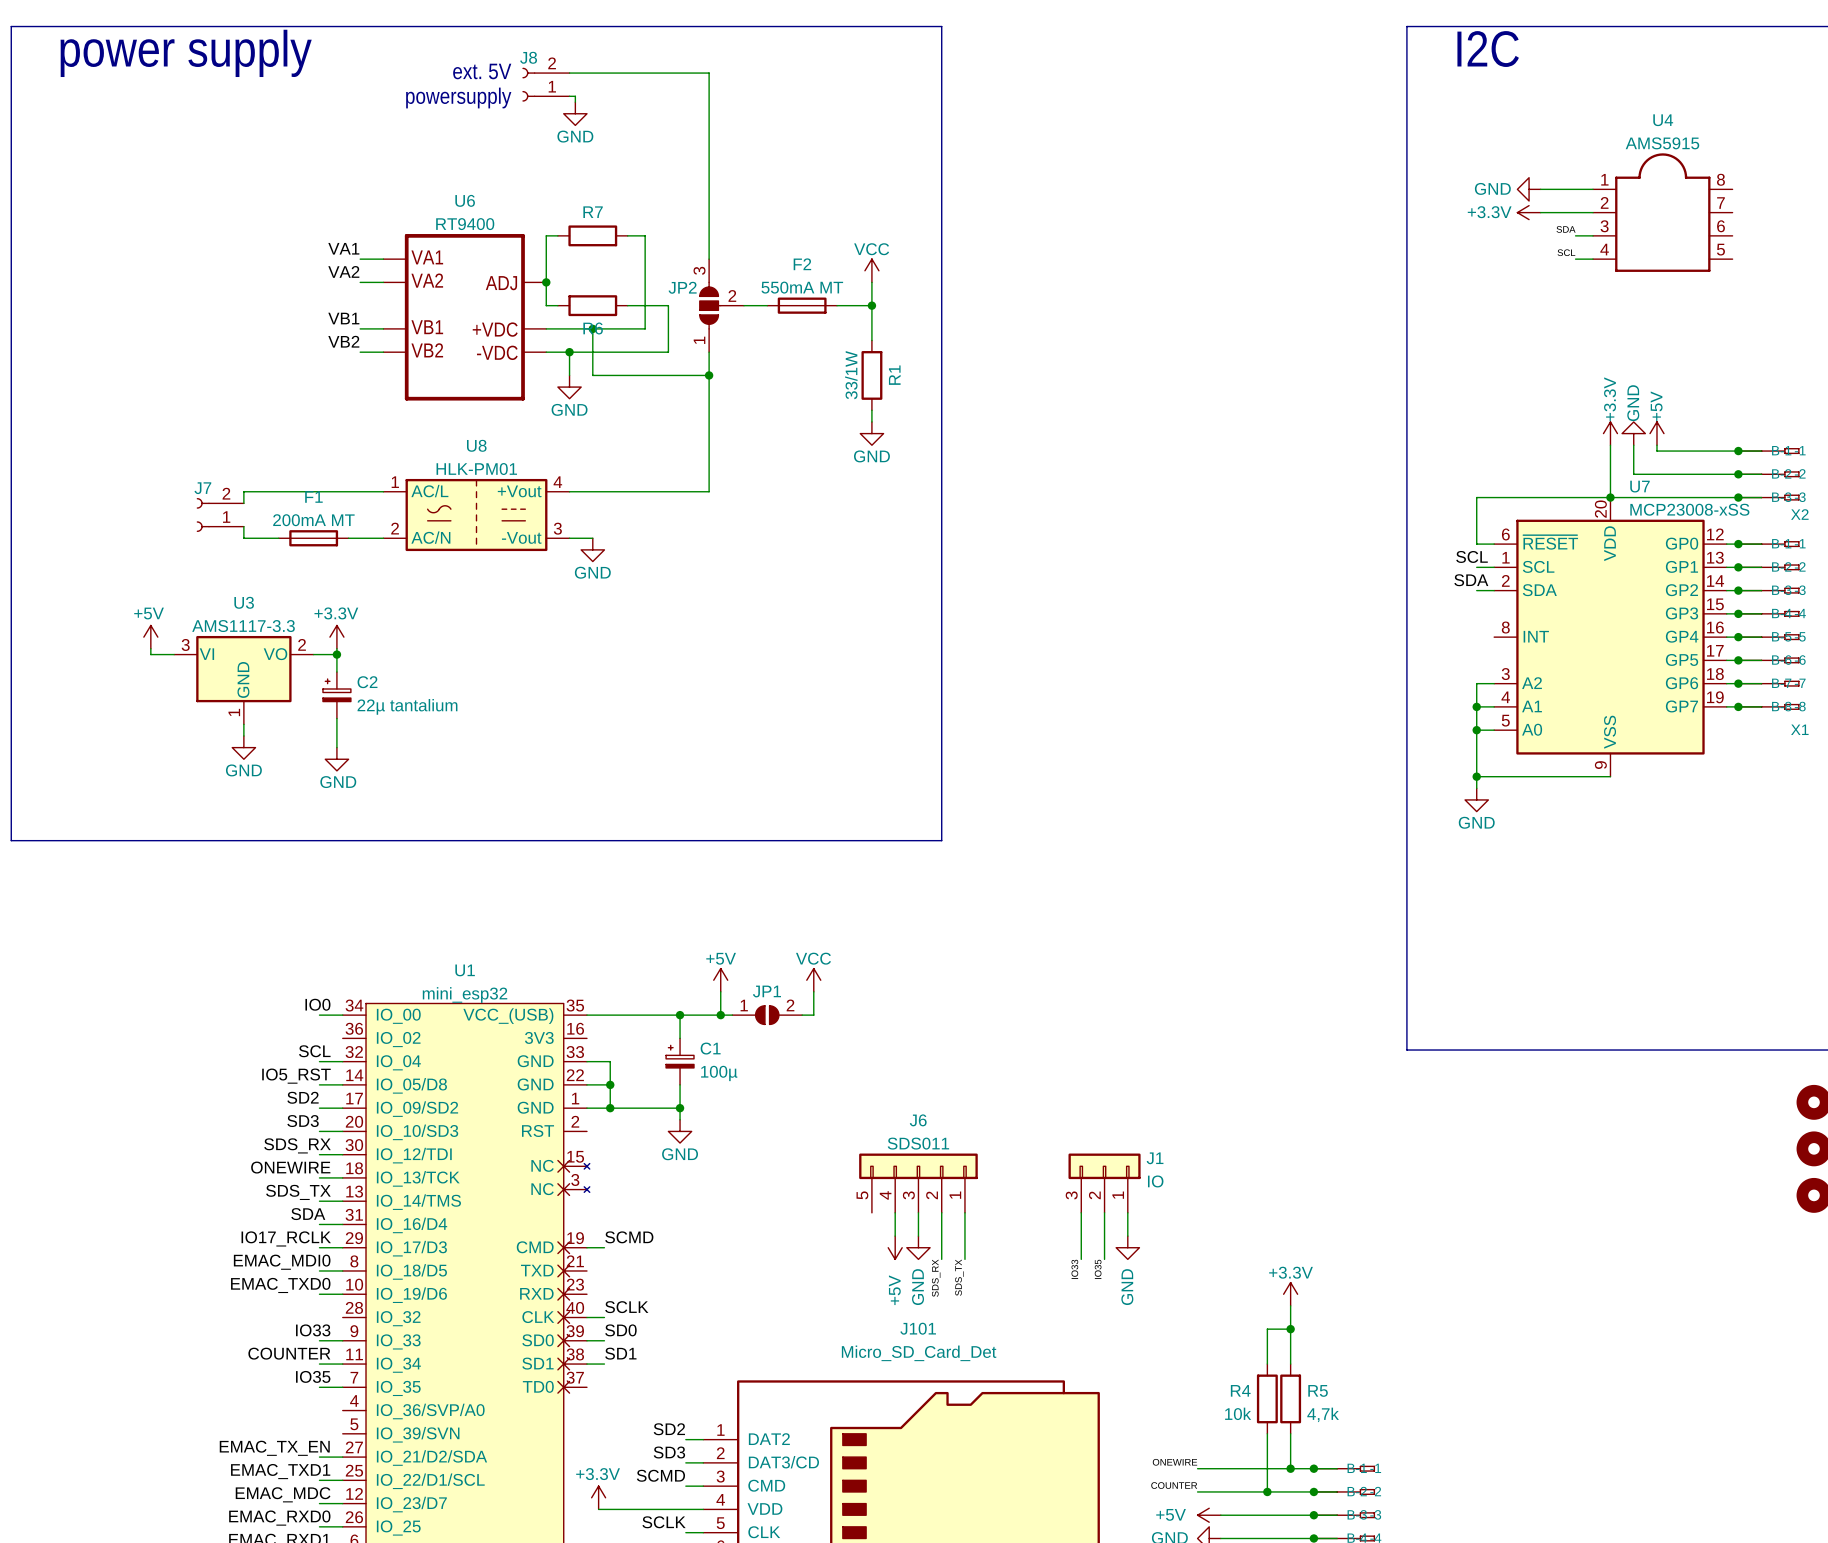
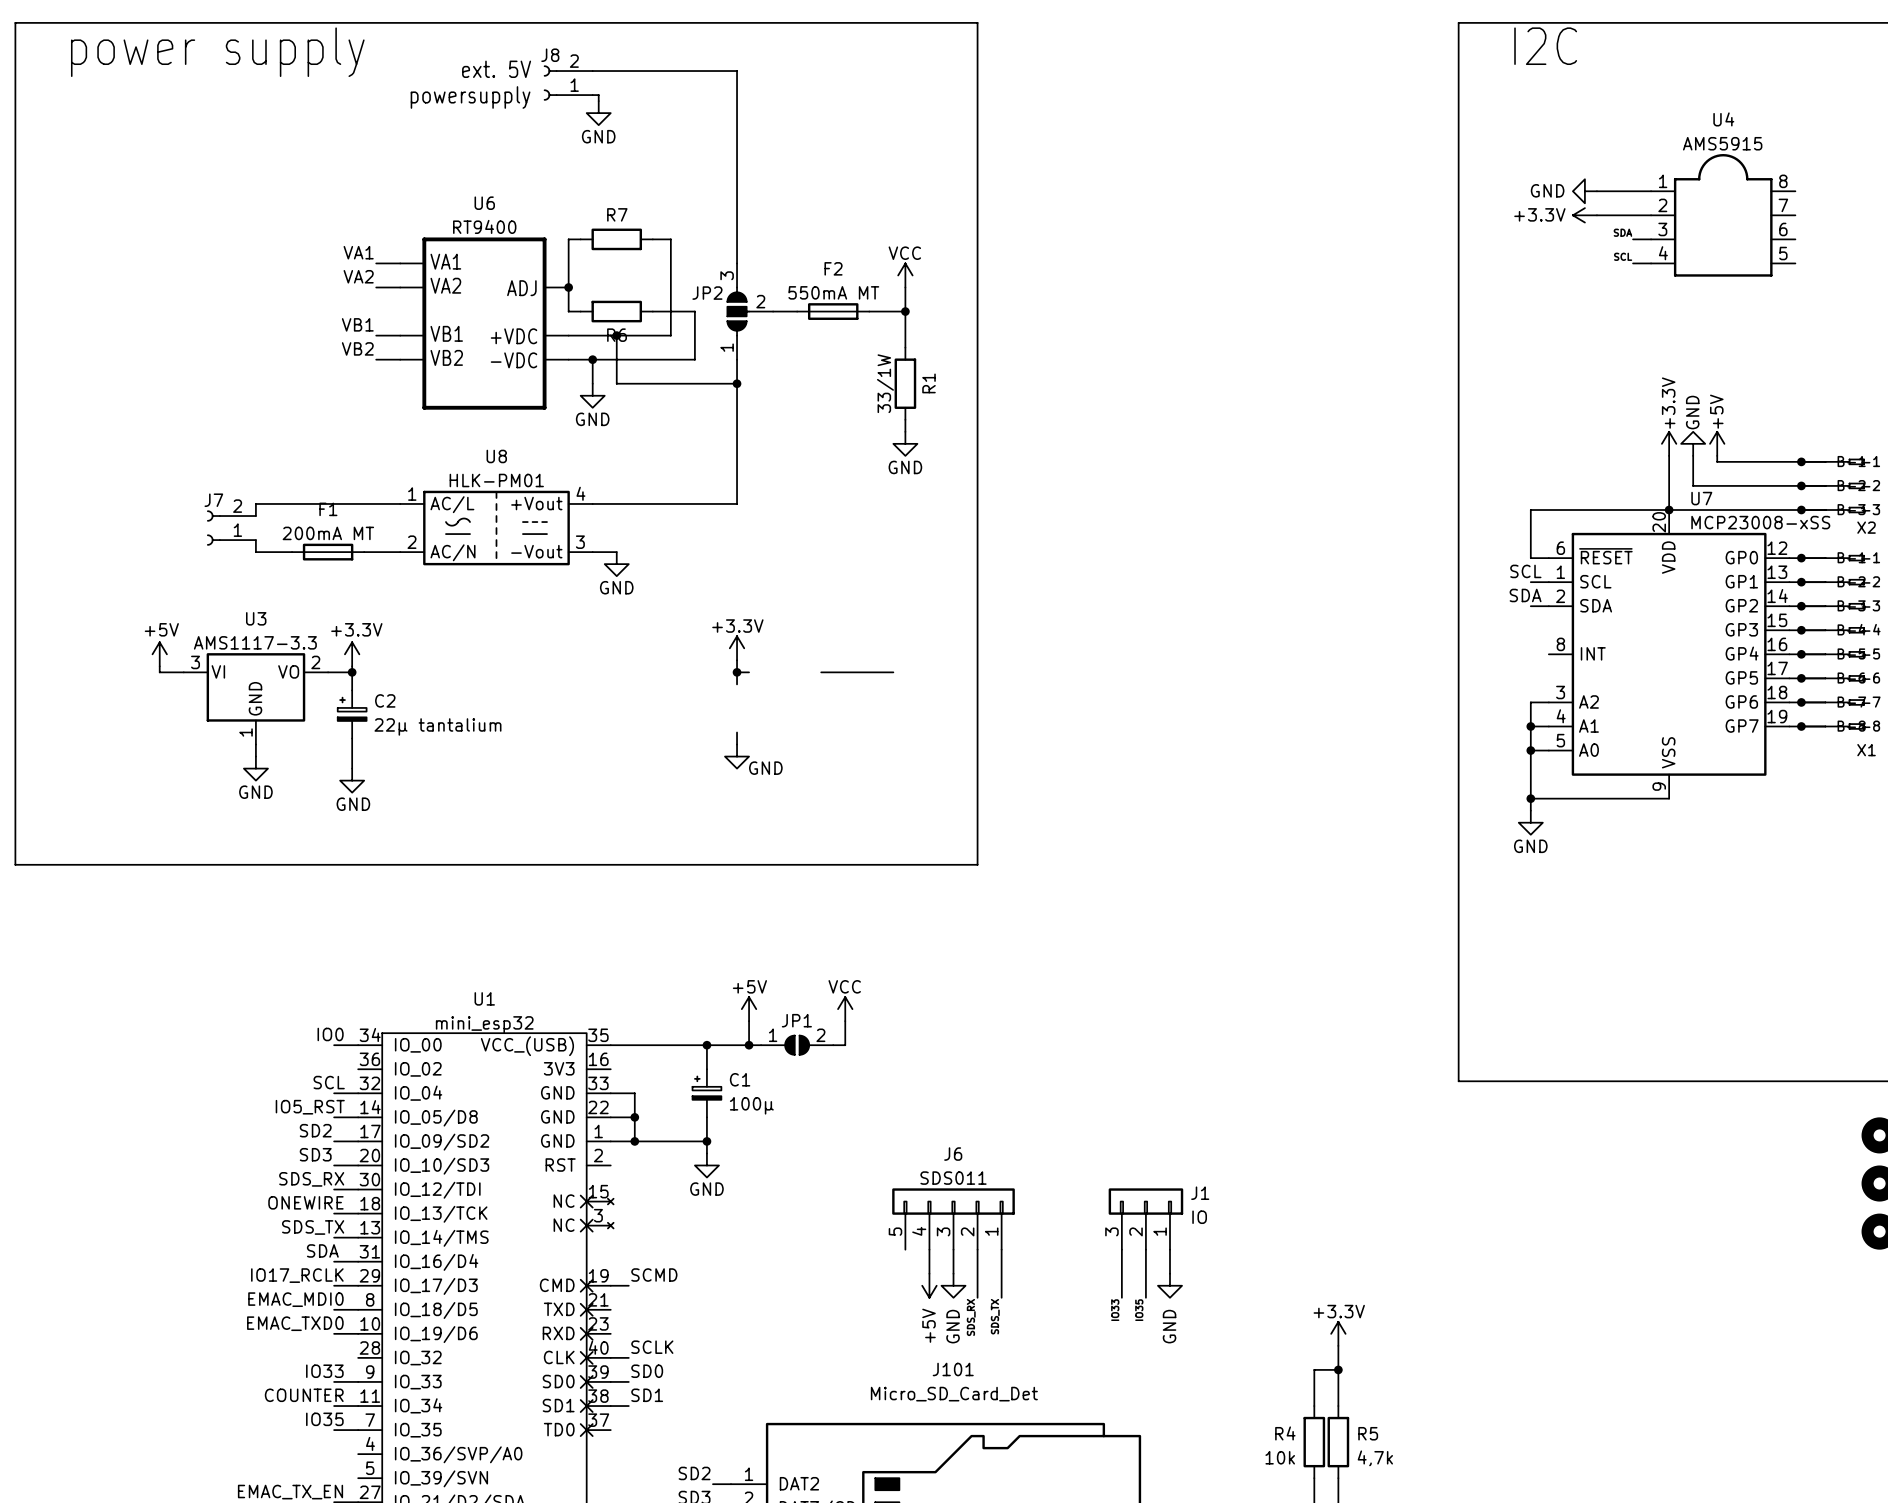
power symbol: none -> +3.3V (737, 648)
wire: none -> (737, 660) (737, 684)
wire: none -> (737, 672) (749, 672)
junction: none -> (737, 672)
wire: none -> (821, 672) (893, 672)
wire: none -> (737, 732) (737, 744)
power symbol: none -> GND (737, 756)

